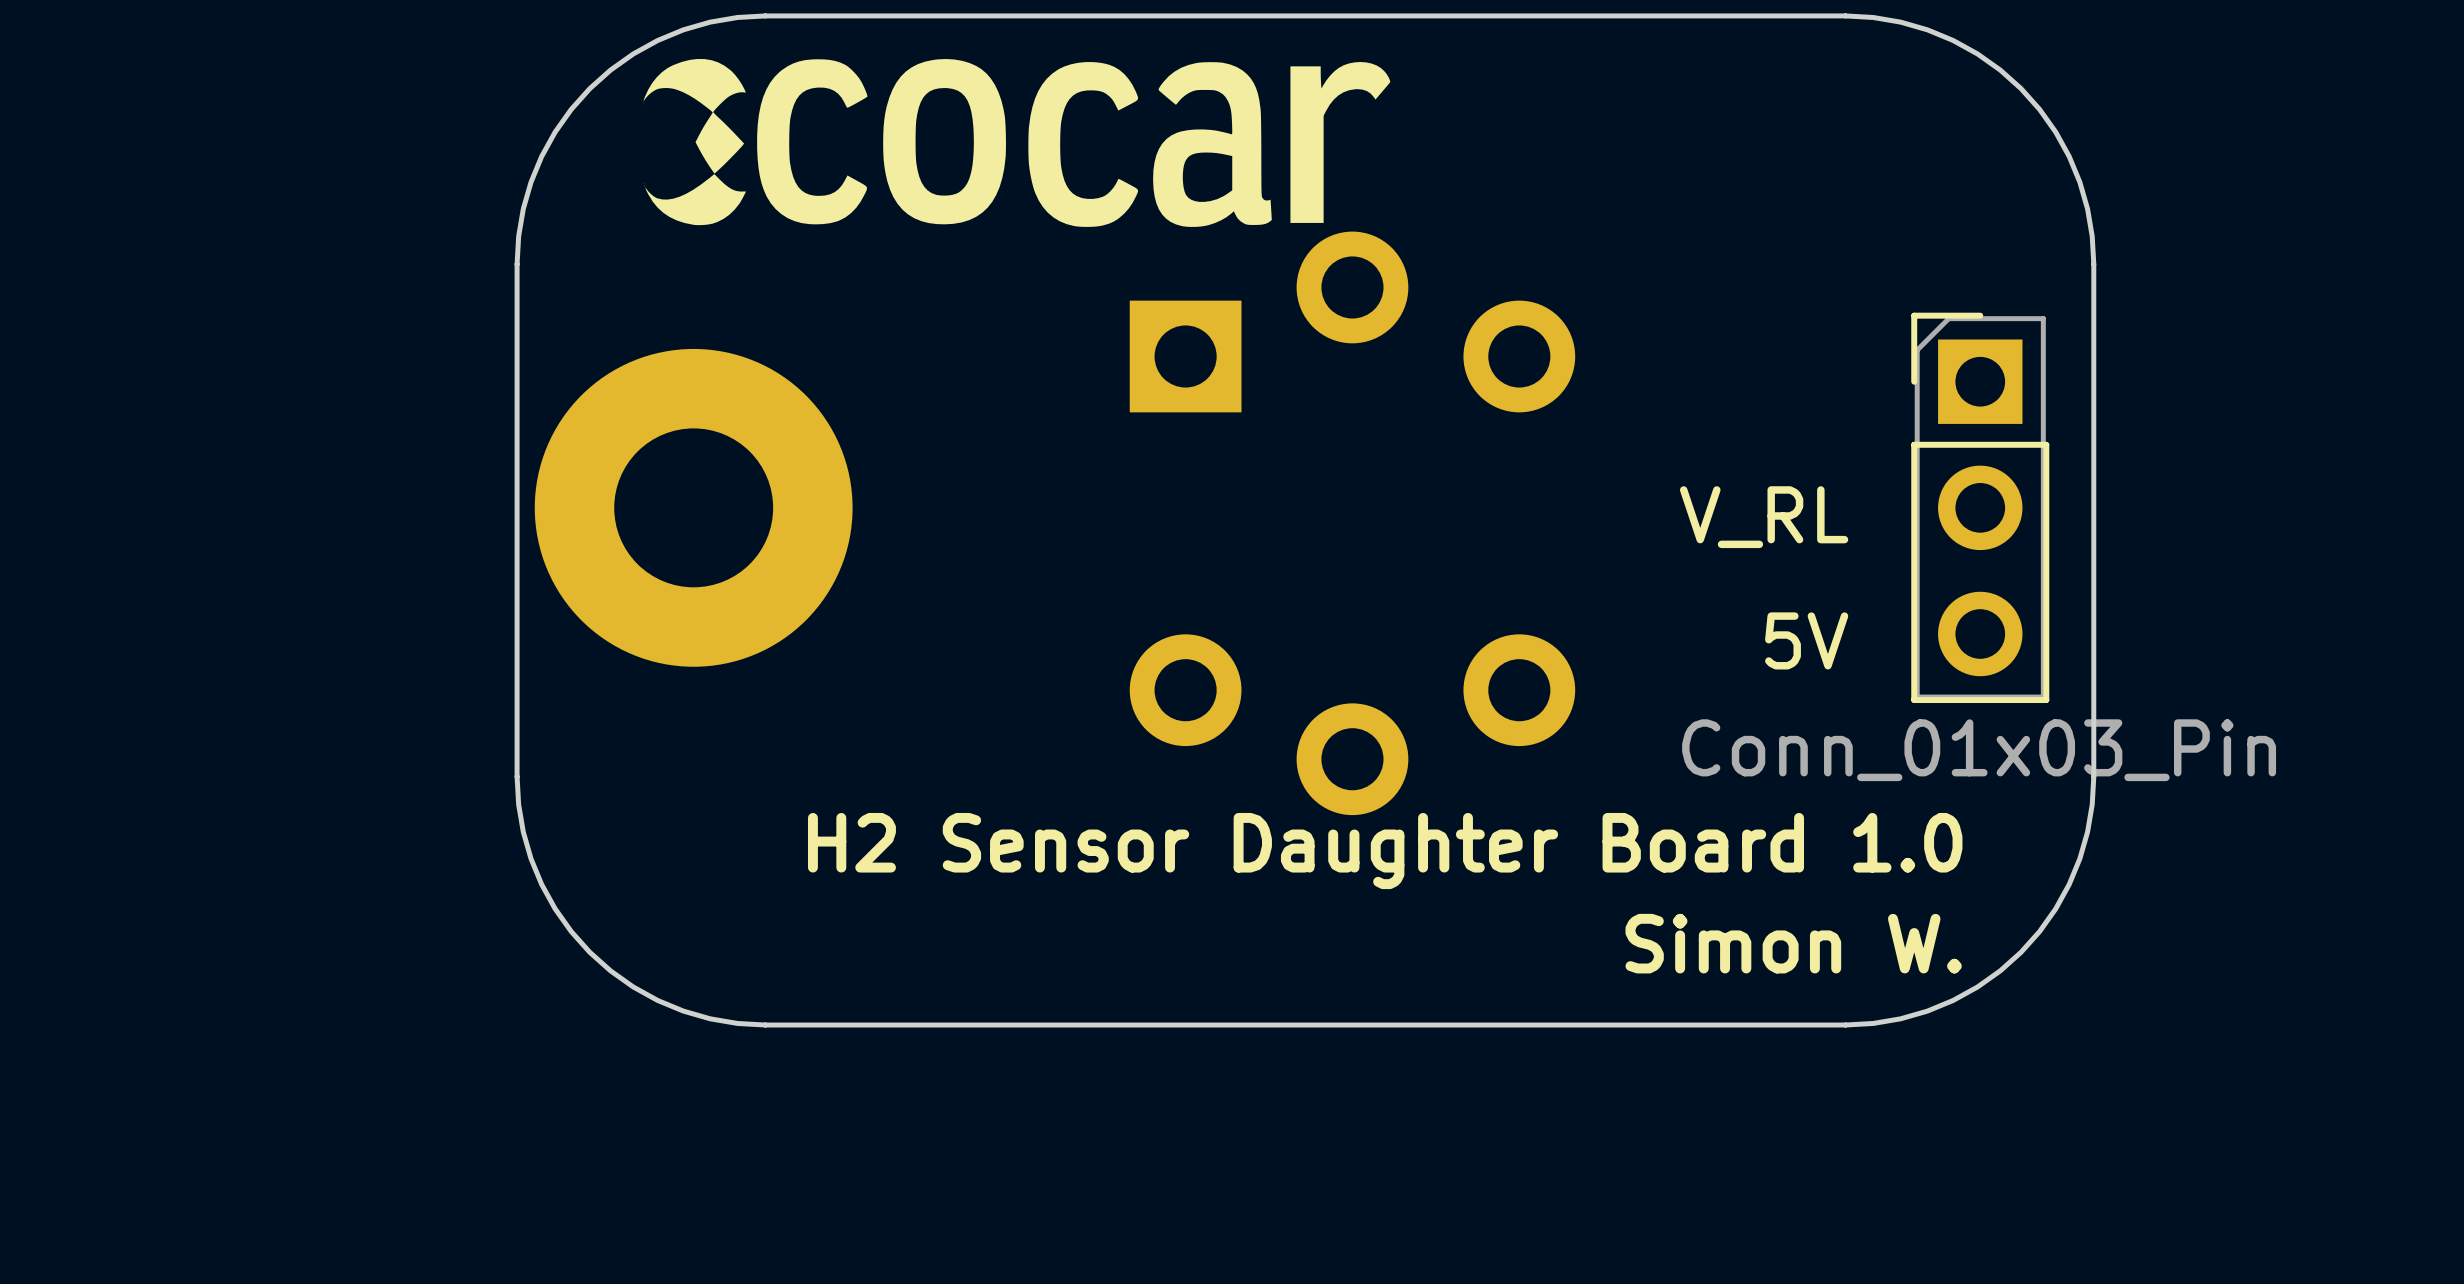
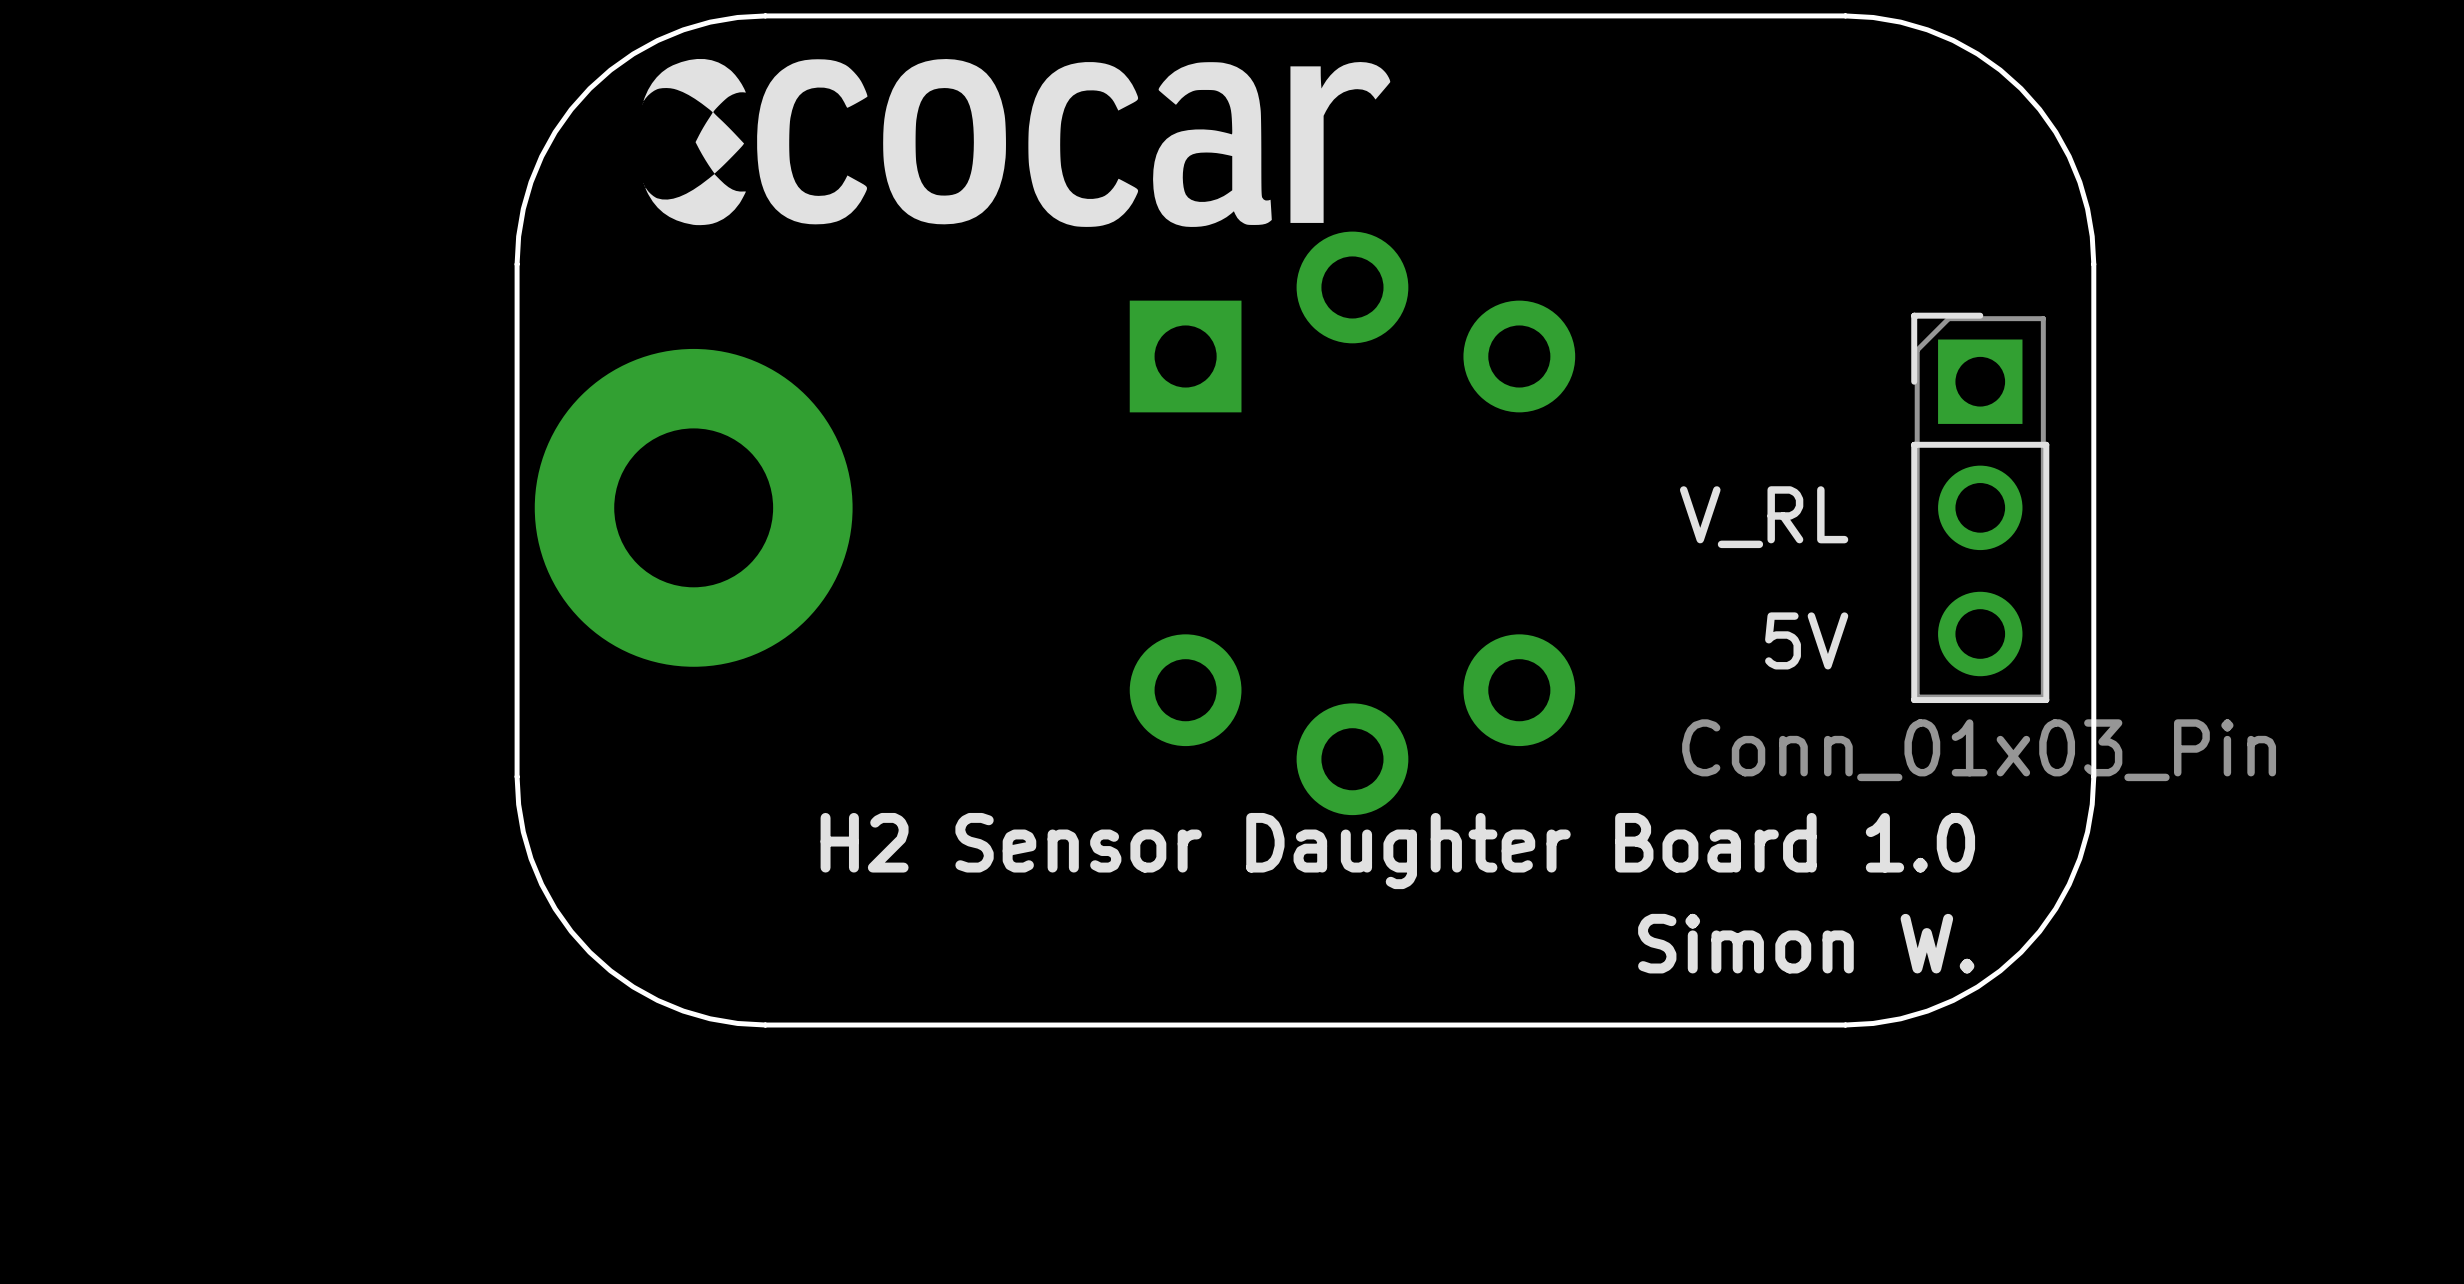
text position: H2 Sensor Daughter Board 1.0 (1385, 851) -> H2 Sensor Daughter Board 1.0 (1397, 851)
text position: Simon W. (1793, 943) -> Simon W. (1806, 943)

